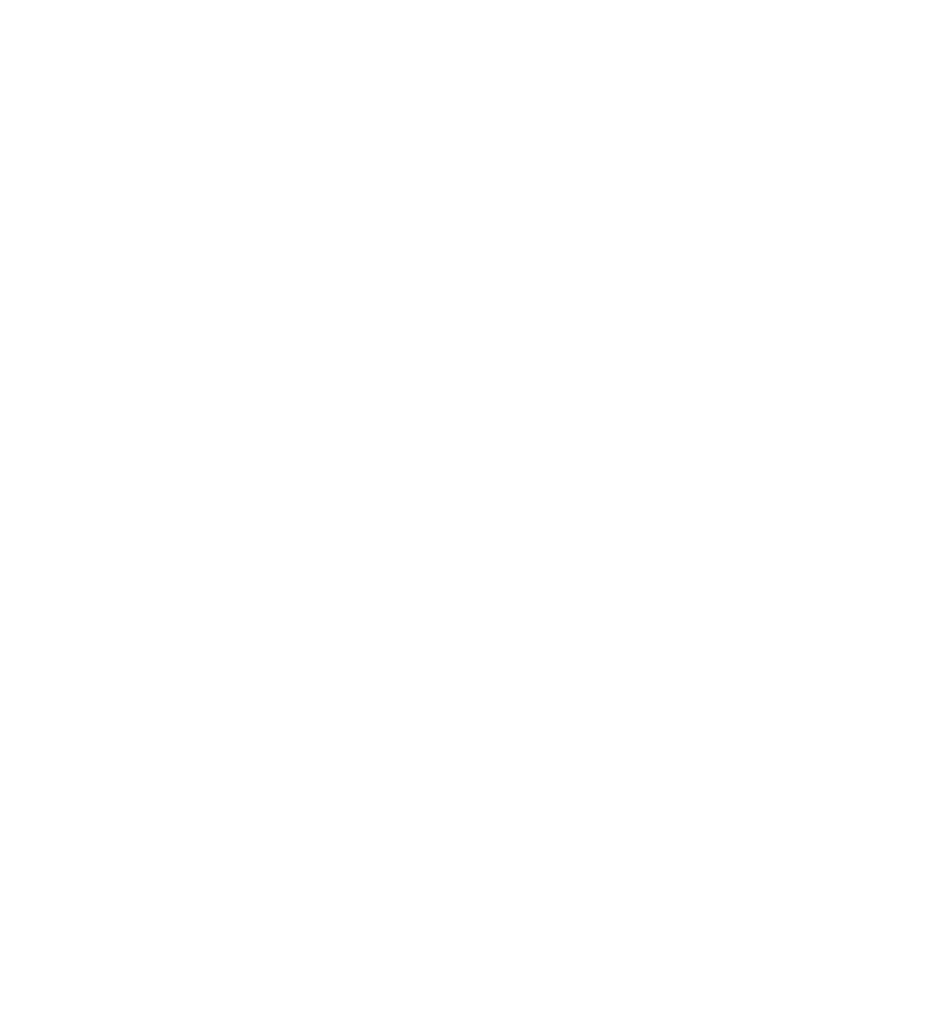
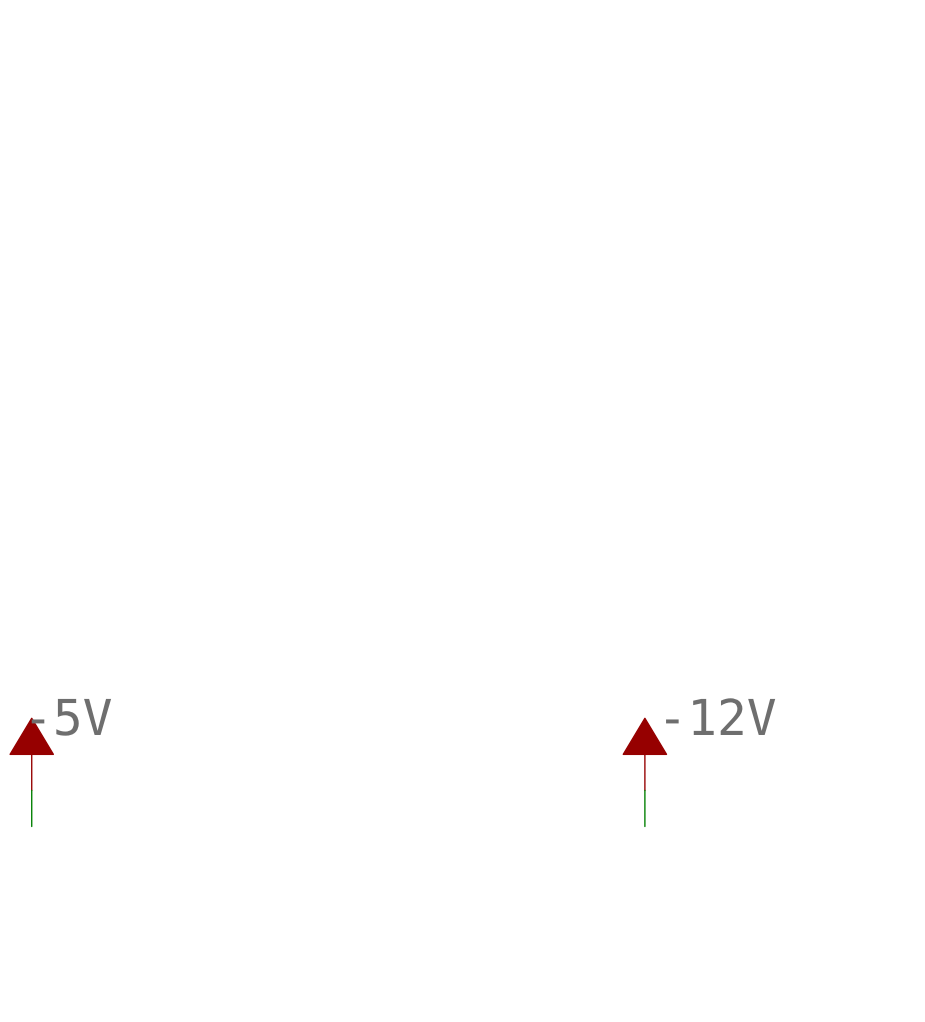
power symbol: none -> -5V (31, 754)
power symbol: none -> -12V (644, 754)
wire: none -> (31, 790) (31, 826)
wire: none -> (644, 790) (644, 826)

